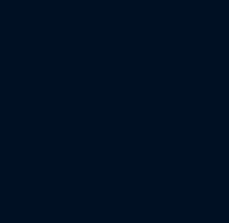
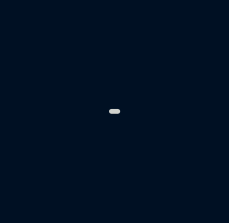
board edge: none -> (111, 111) (117, 111)

